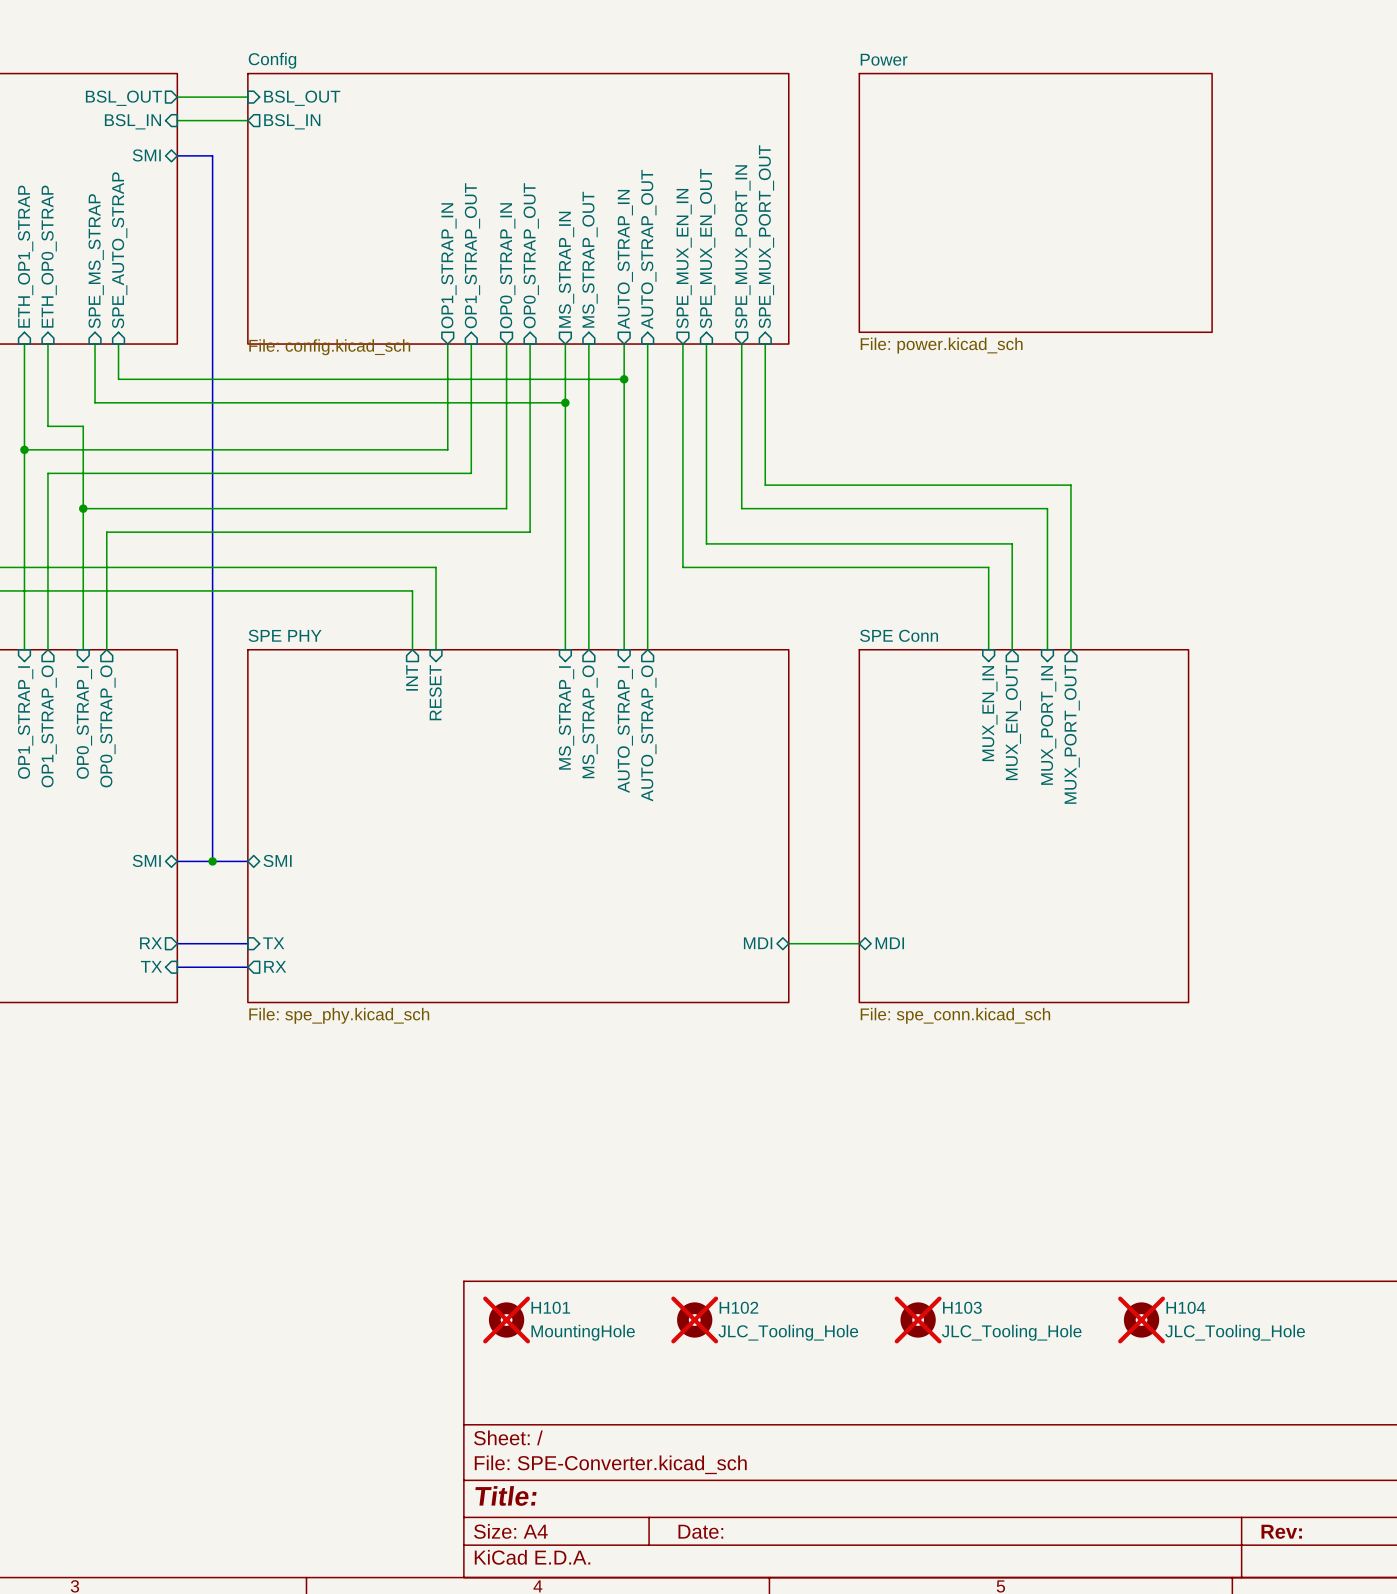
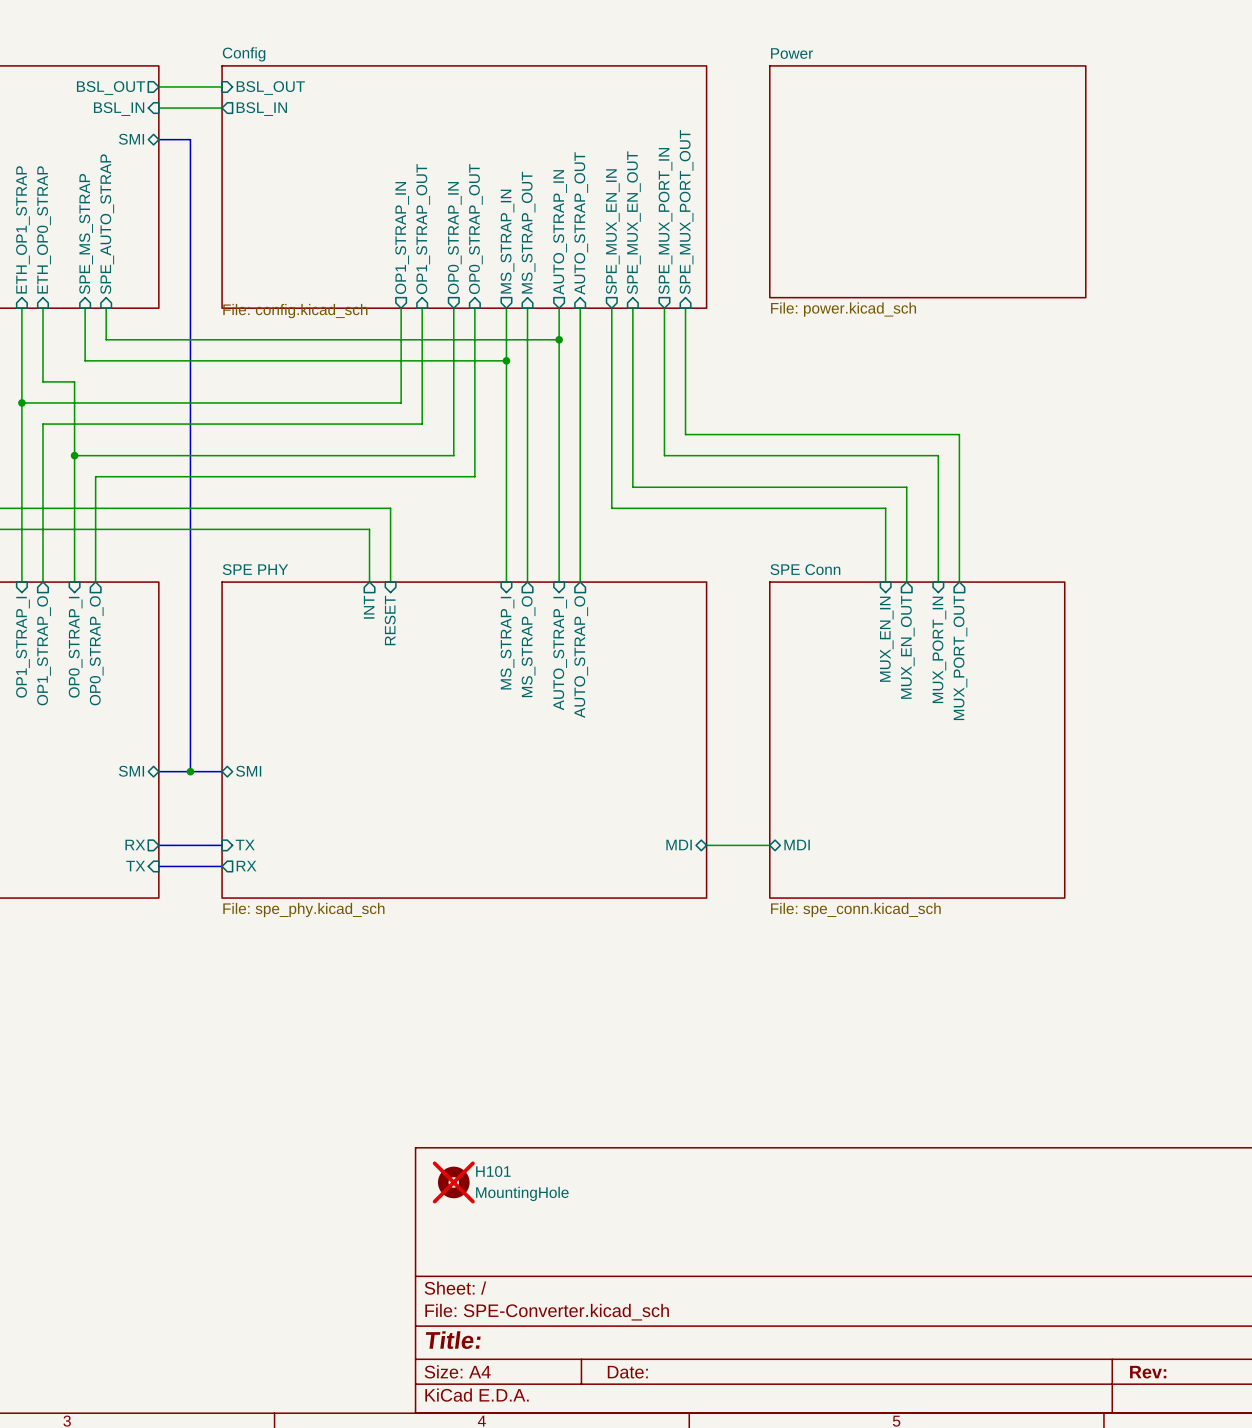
H102: JLC_Tooling_Hole (694, 1319) -> none
H103: JLC_Tooling_Hole (918, 1319) -> none
H104: JLC_Tooling_Hole (1141, 1319) -> none

